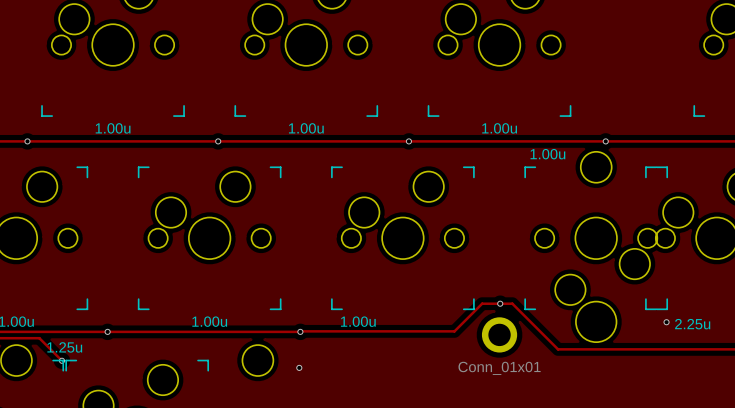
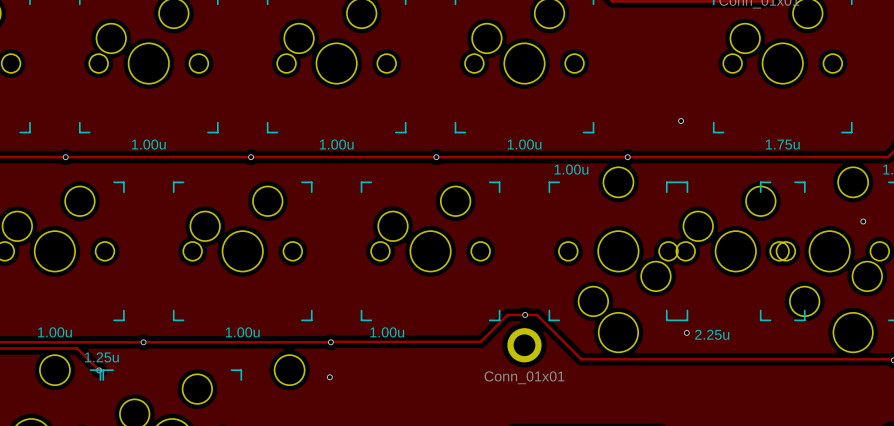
via: none -> (681, 121)

